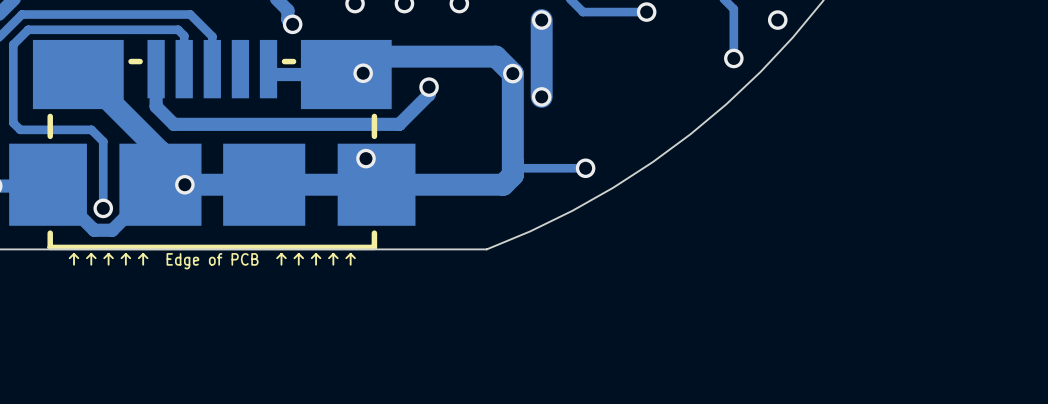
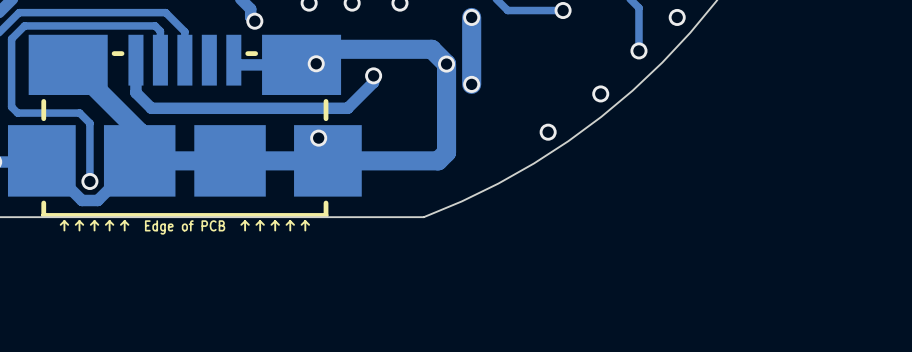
via: none -> (600, 93)
track: (512, 162) (518, 168) (585, 168) -> none
via position: (585, 168) -> (548, 132)
via: (184, 184) -> none

